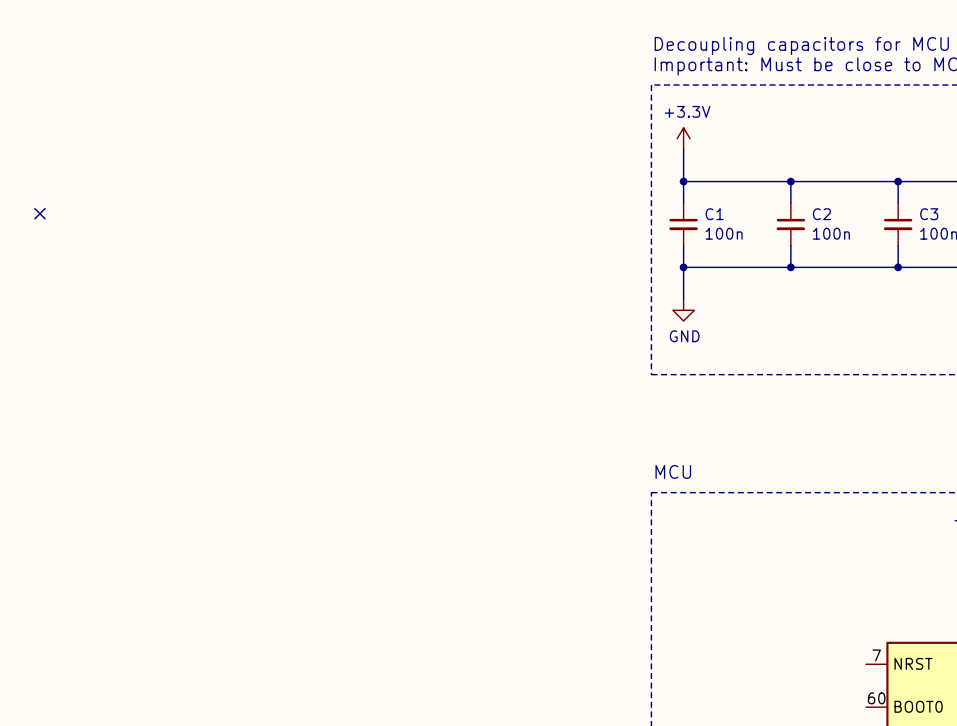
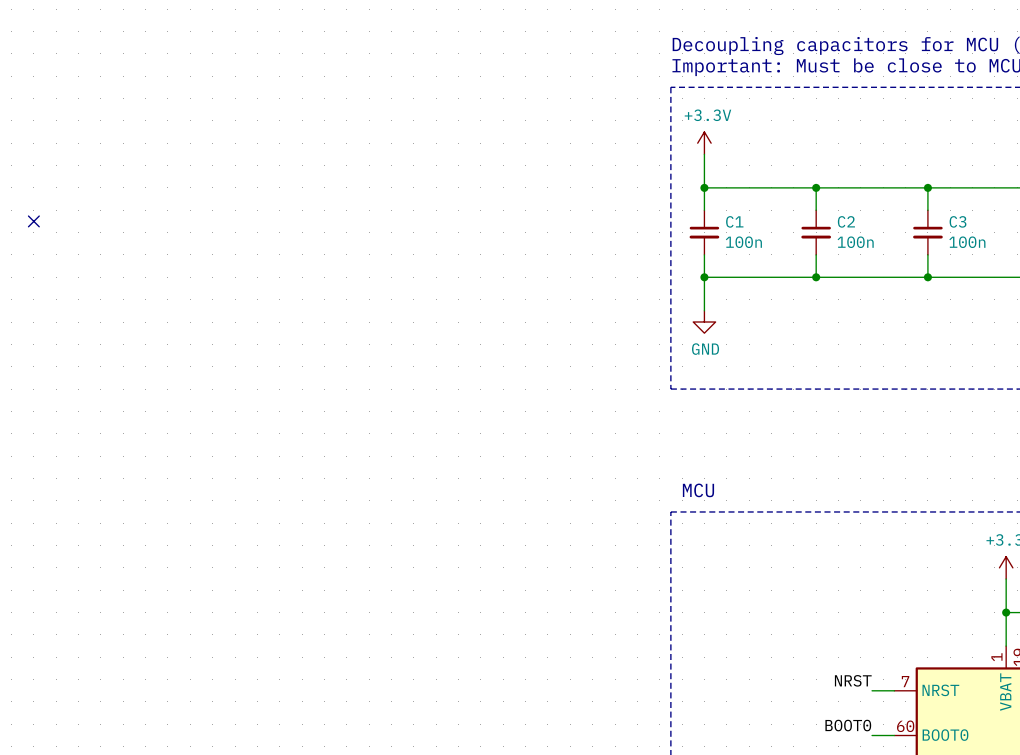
label: none -> NRST (853, 680)
wire: none -> (872, 690) (894, 690)
label: none -> BOOT0 (848, 725)
wire: none -> (872, 735) (894, 735)

